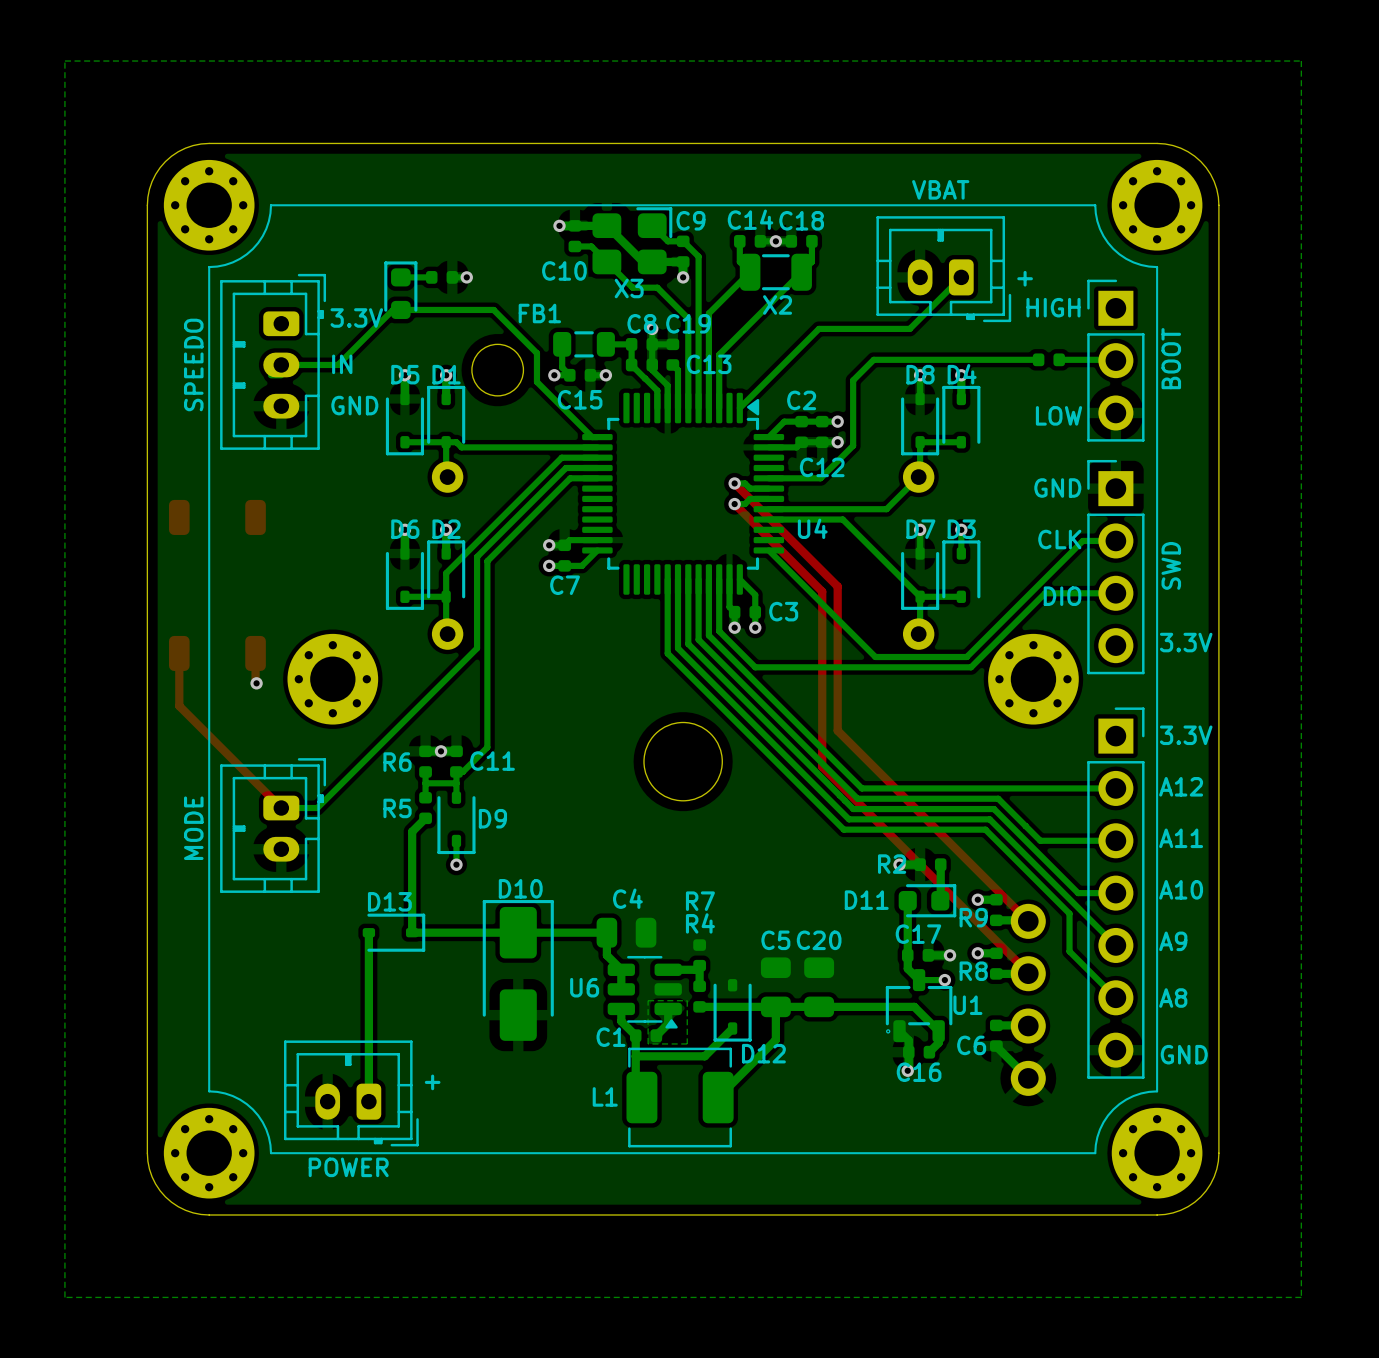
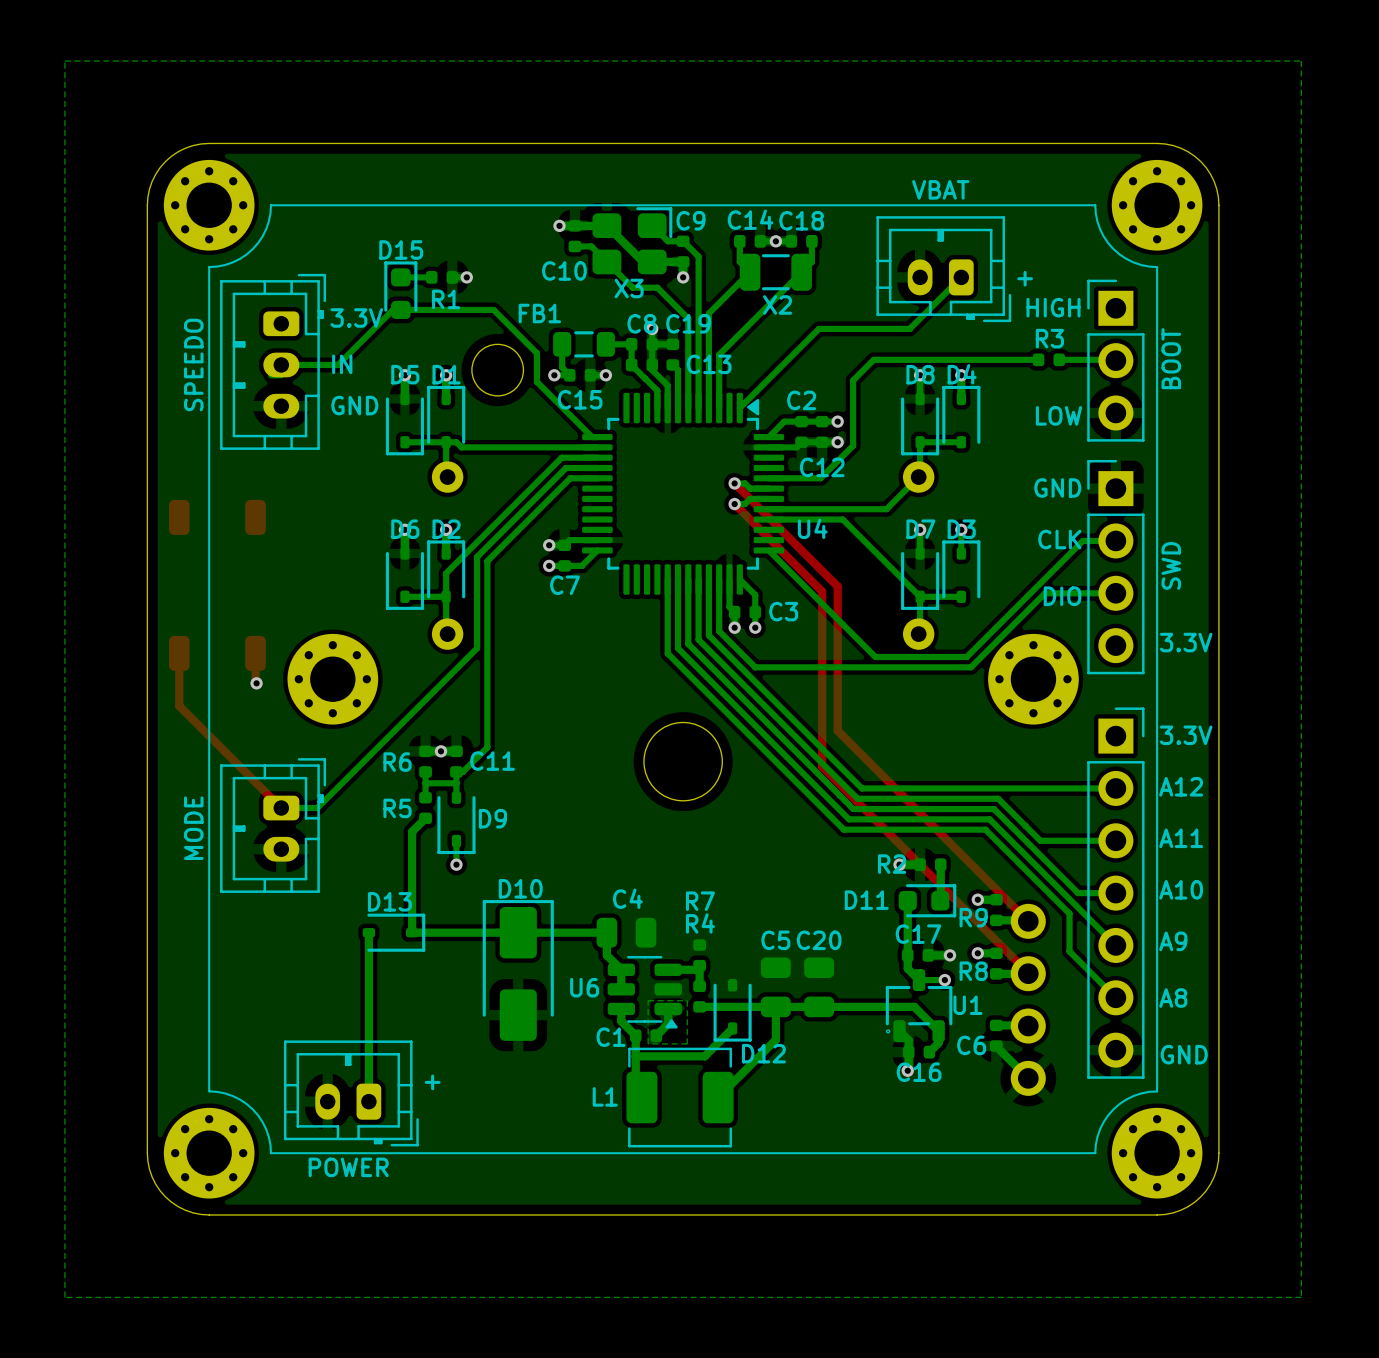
D15 name: none -> D15 (401, 249)
R1 name: none -> R1 (446, 299)
R3 name: none -> R3 (1049, 338)

